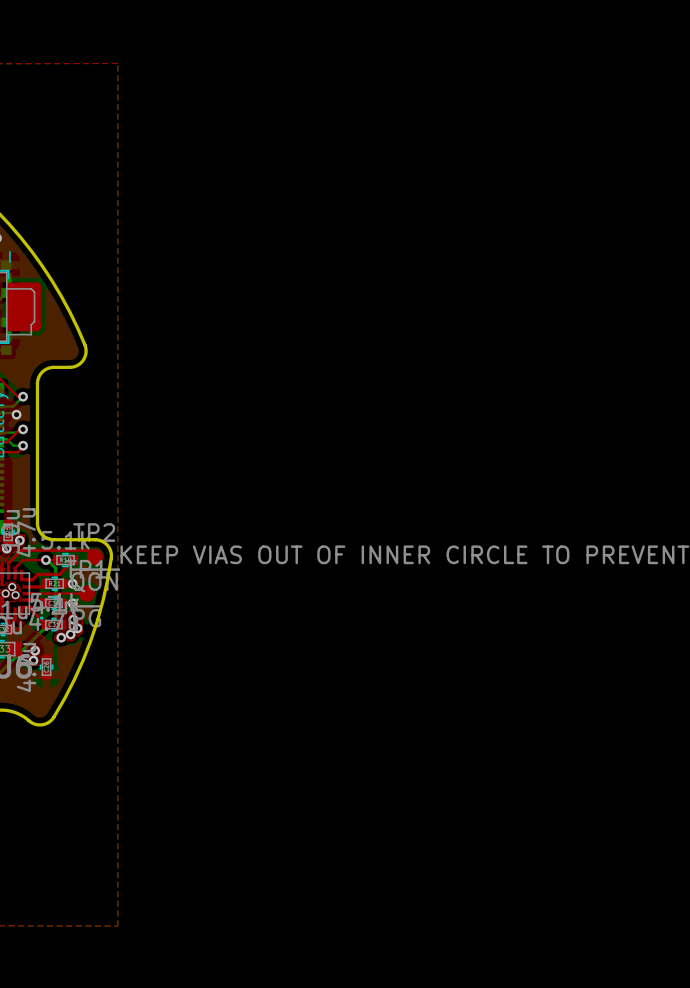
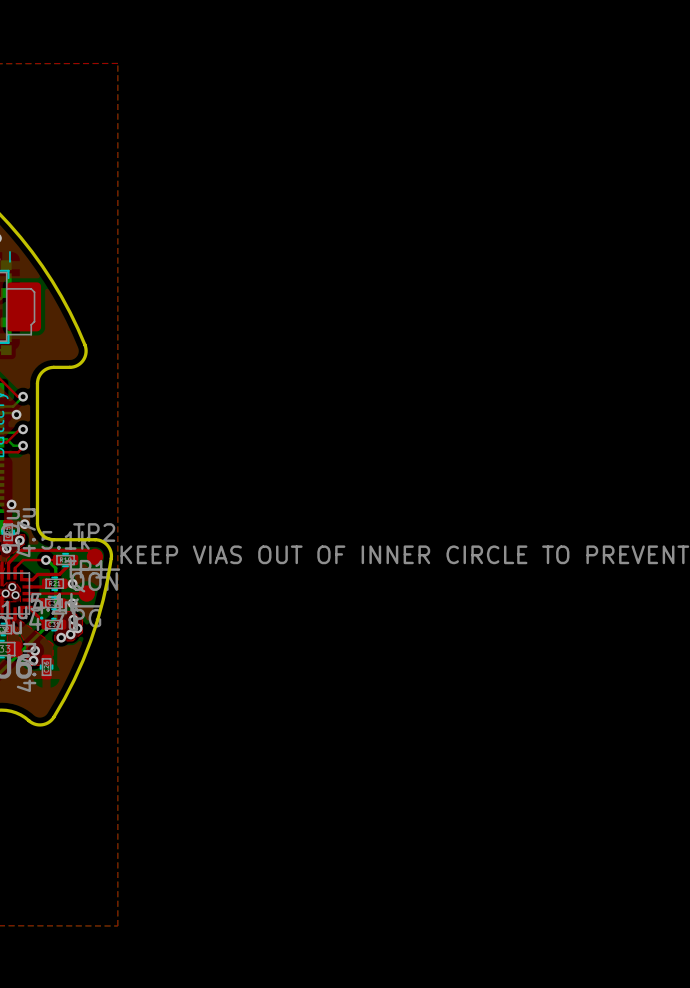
via: none -> (11, 504)
via: none -> (24, 524)

